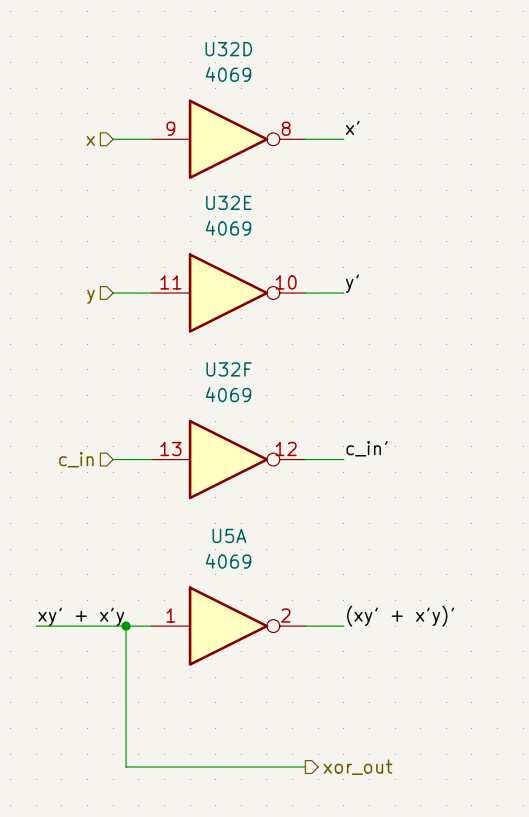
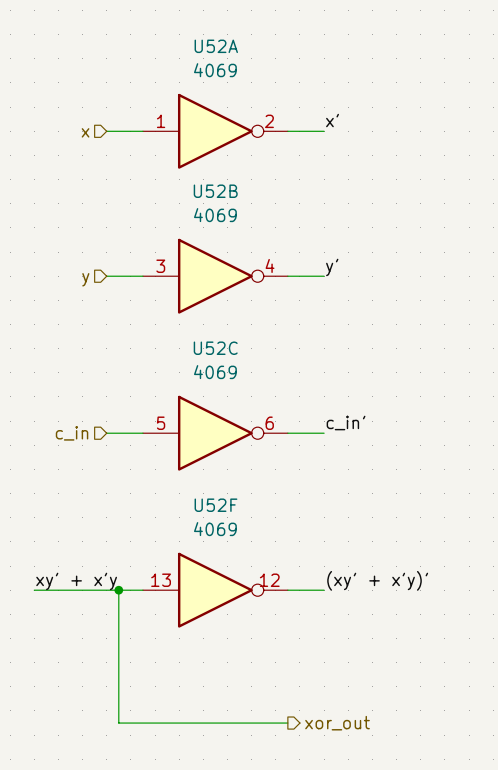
U32D name: U32D (228, 49) -> U52A (216, 46)
U32D pin number: 9 (170, 128) -> 1 (161, 121)
U32D pin number: 8 (286, 128) -> 2 (269, 121)
U32E name: U32E (228, 202) -> U52B (215, 191)
U32E pin number: 11 (170, 282) -> 3 (160, 266)
U32E pin number: 10 (286, 282) -> 4 (270, 265)
U32F name: U32F (229, 369) -> U52C (215, 348)
U32F pin number: 13 (170, 448) -> 5 (161, 423)
U32F pin number: 12 (286, 448) -> 6 (269, 423)
U5A name: U5A (229, 535) -> U52F (215, 505)
U5A pin number: 1 (170, 615) -> 13 (161, 580)
U5A pin number: 2 (285, 615) -> 12 (269, 580)

